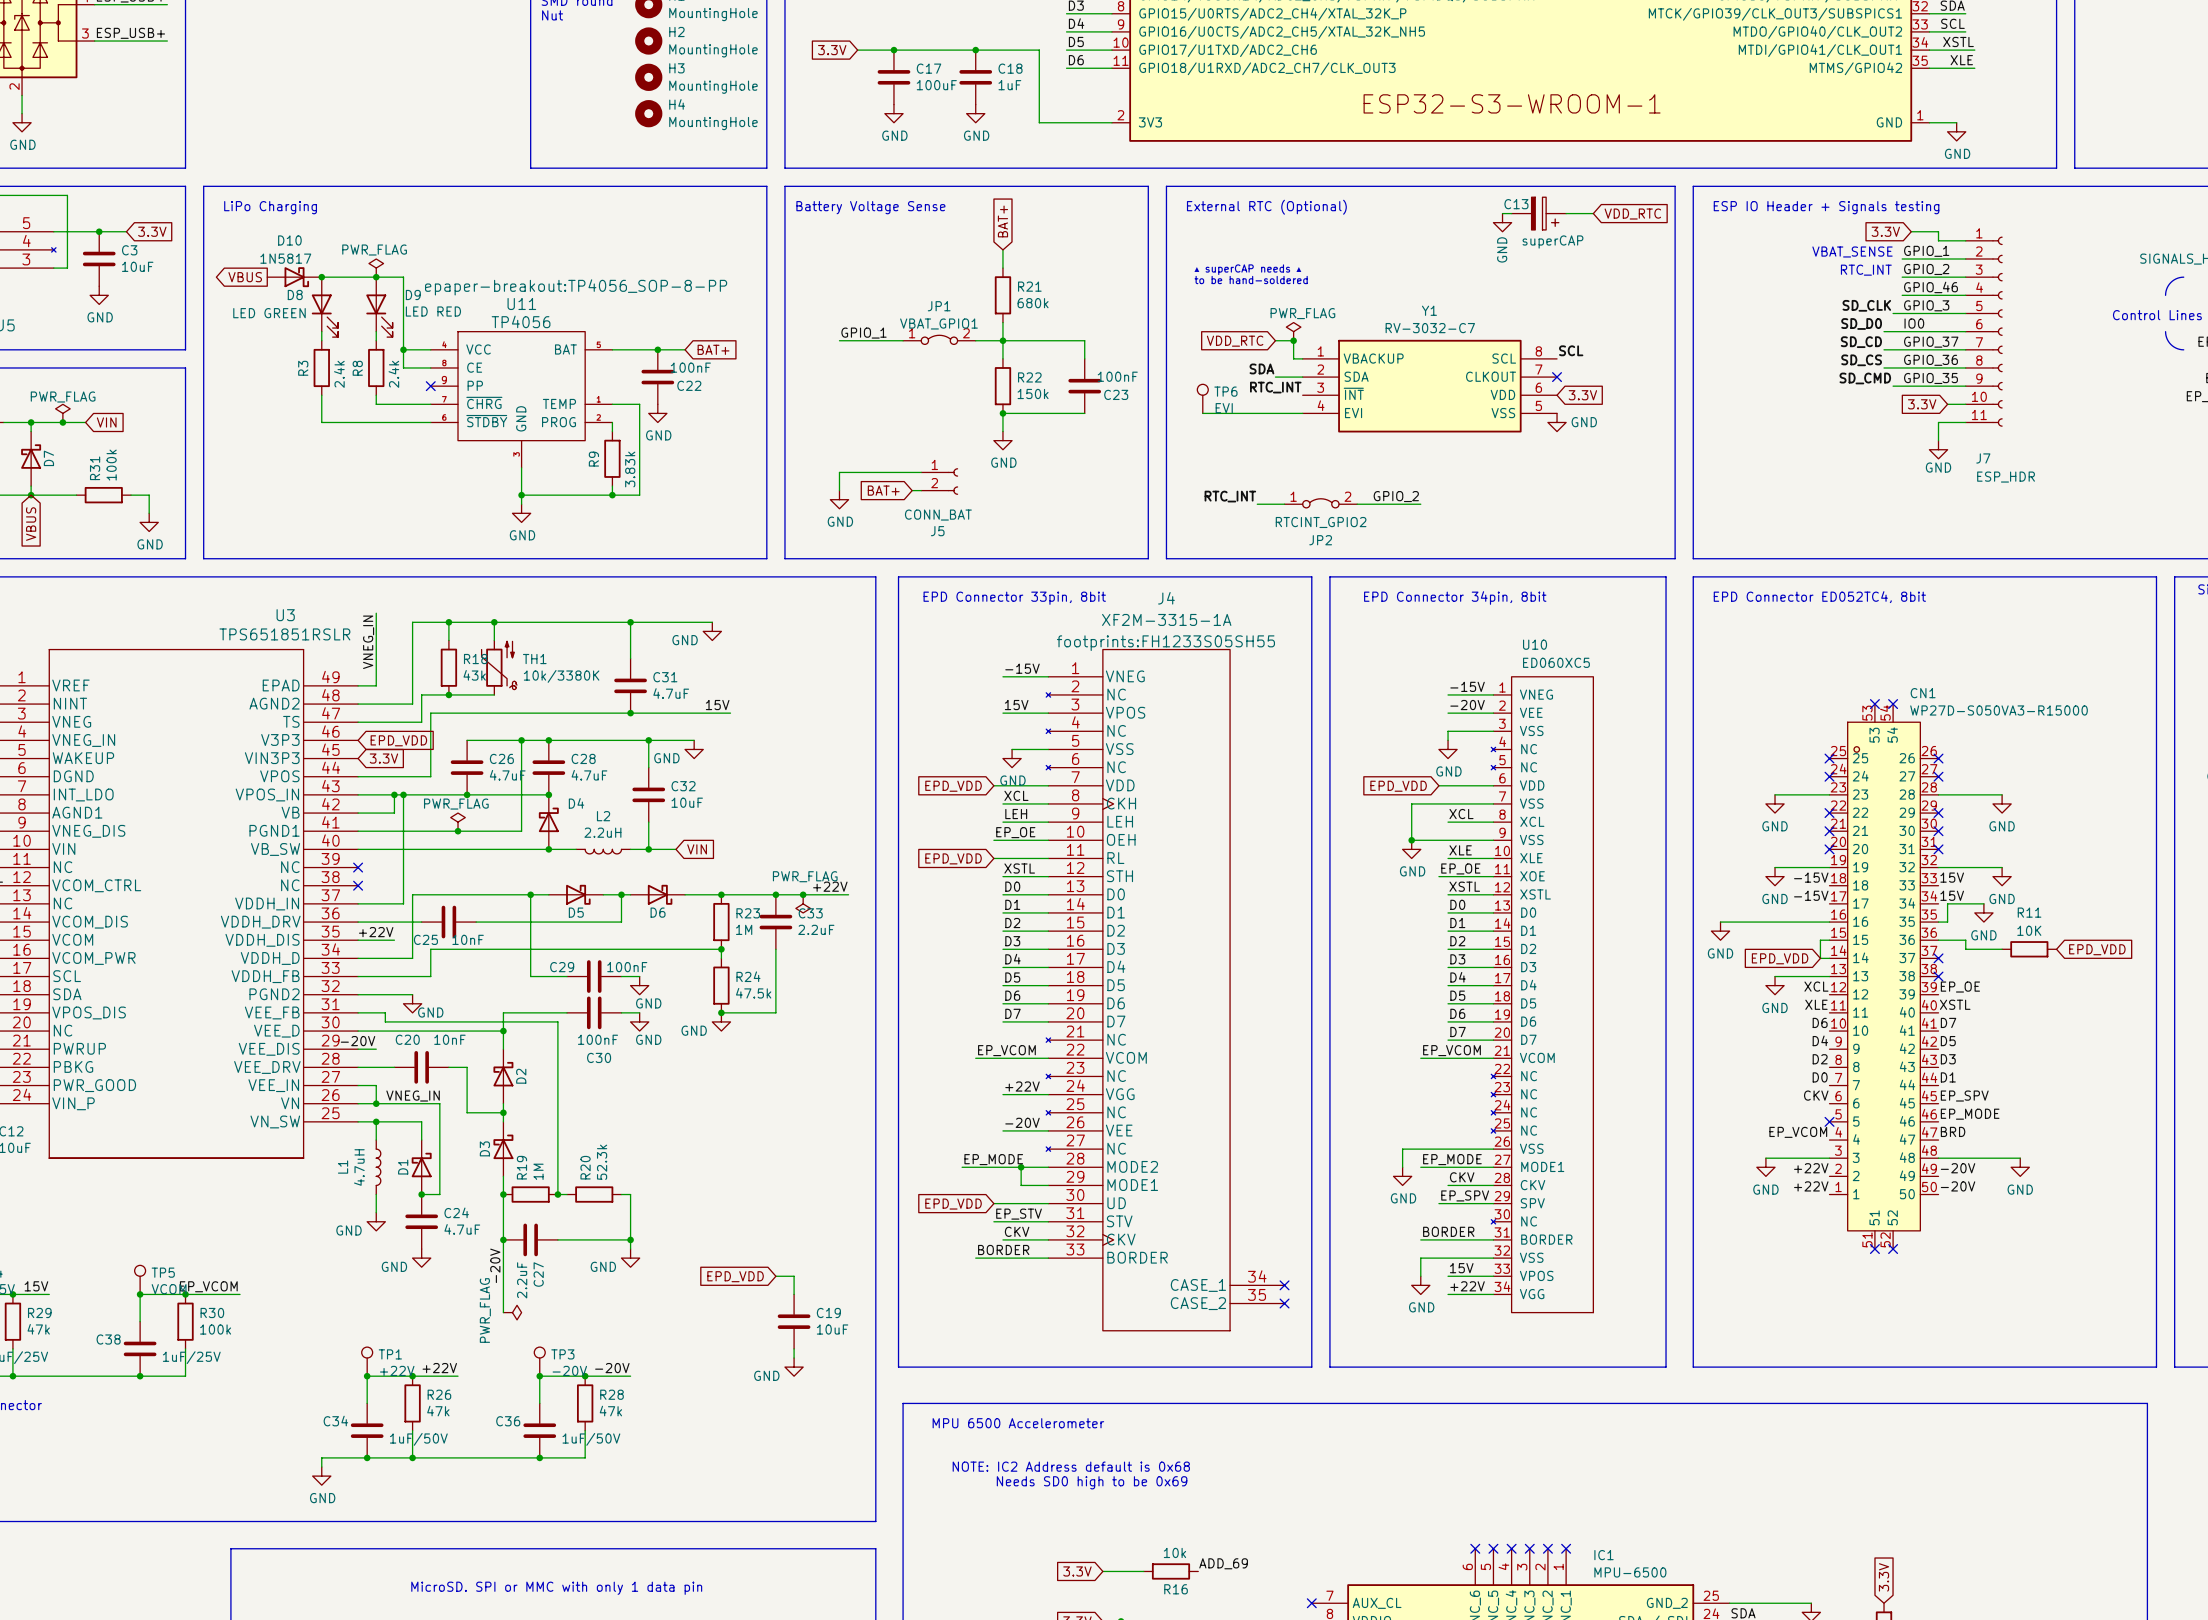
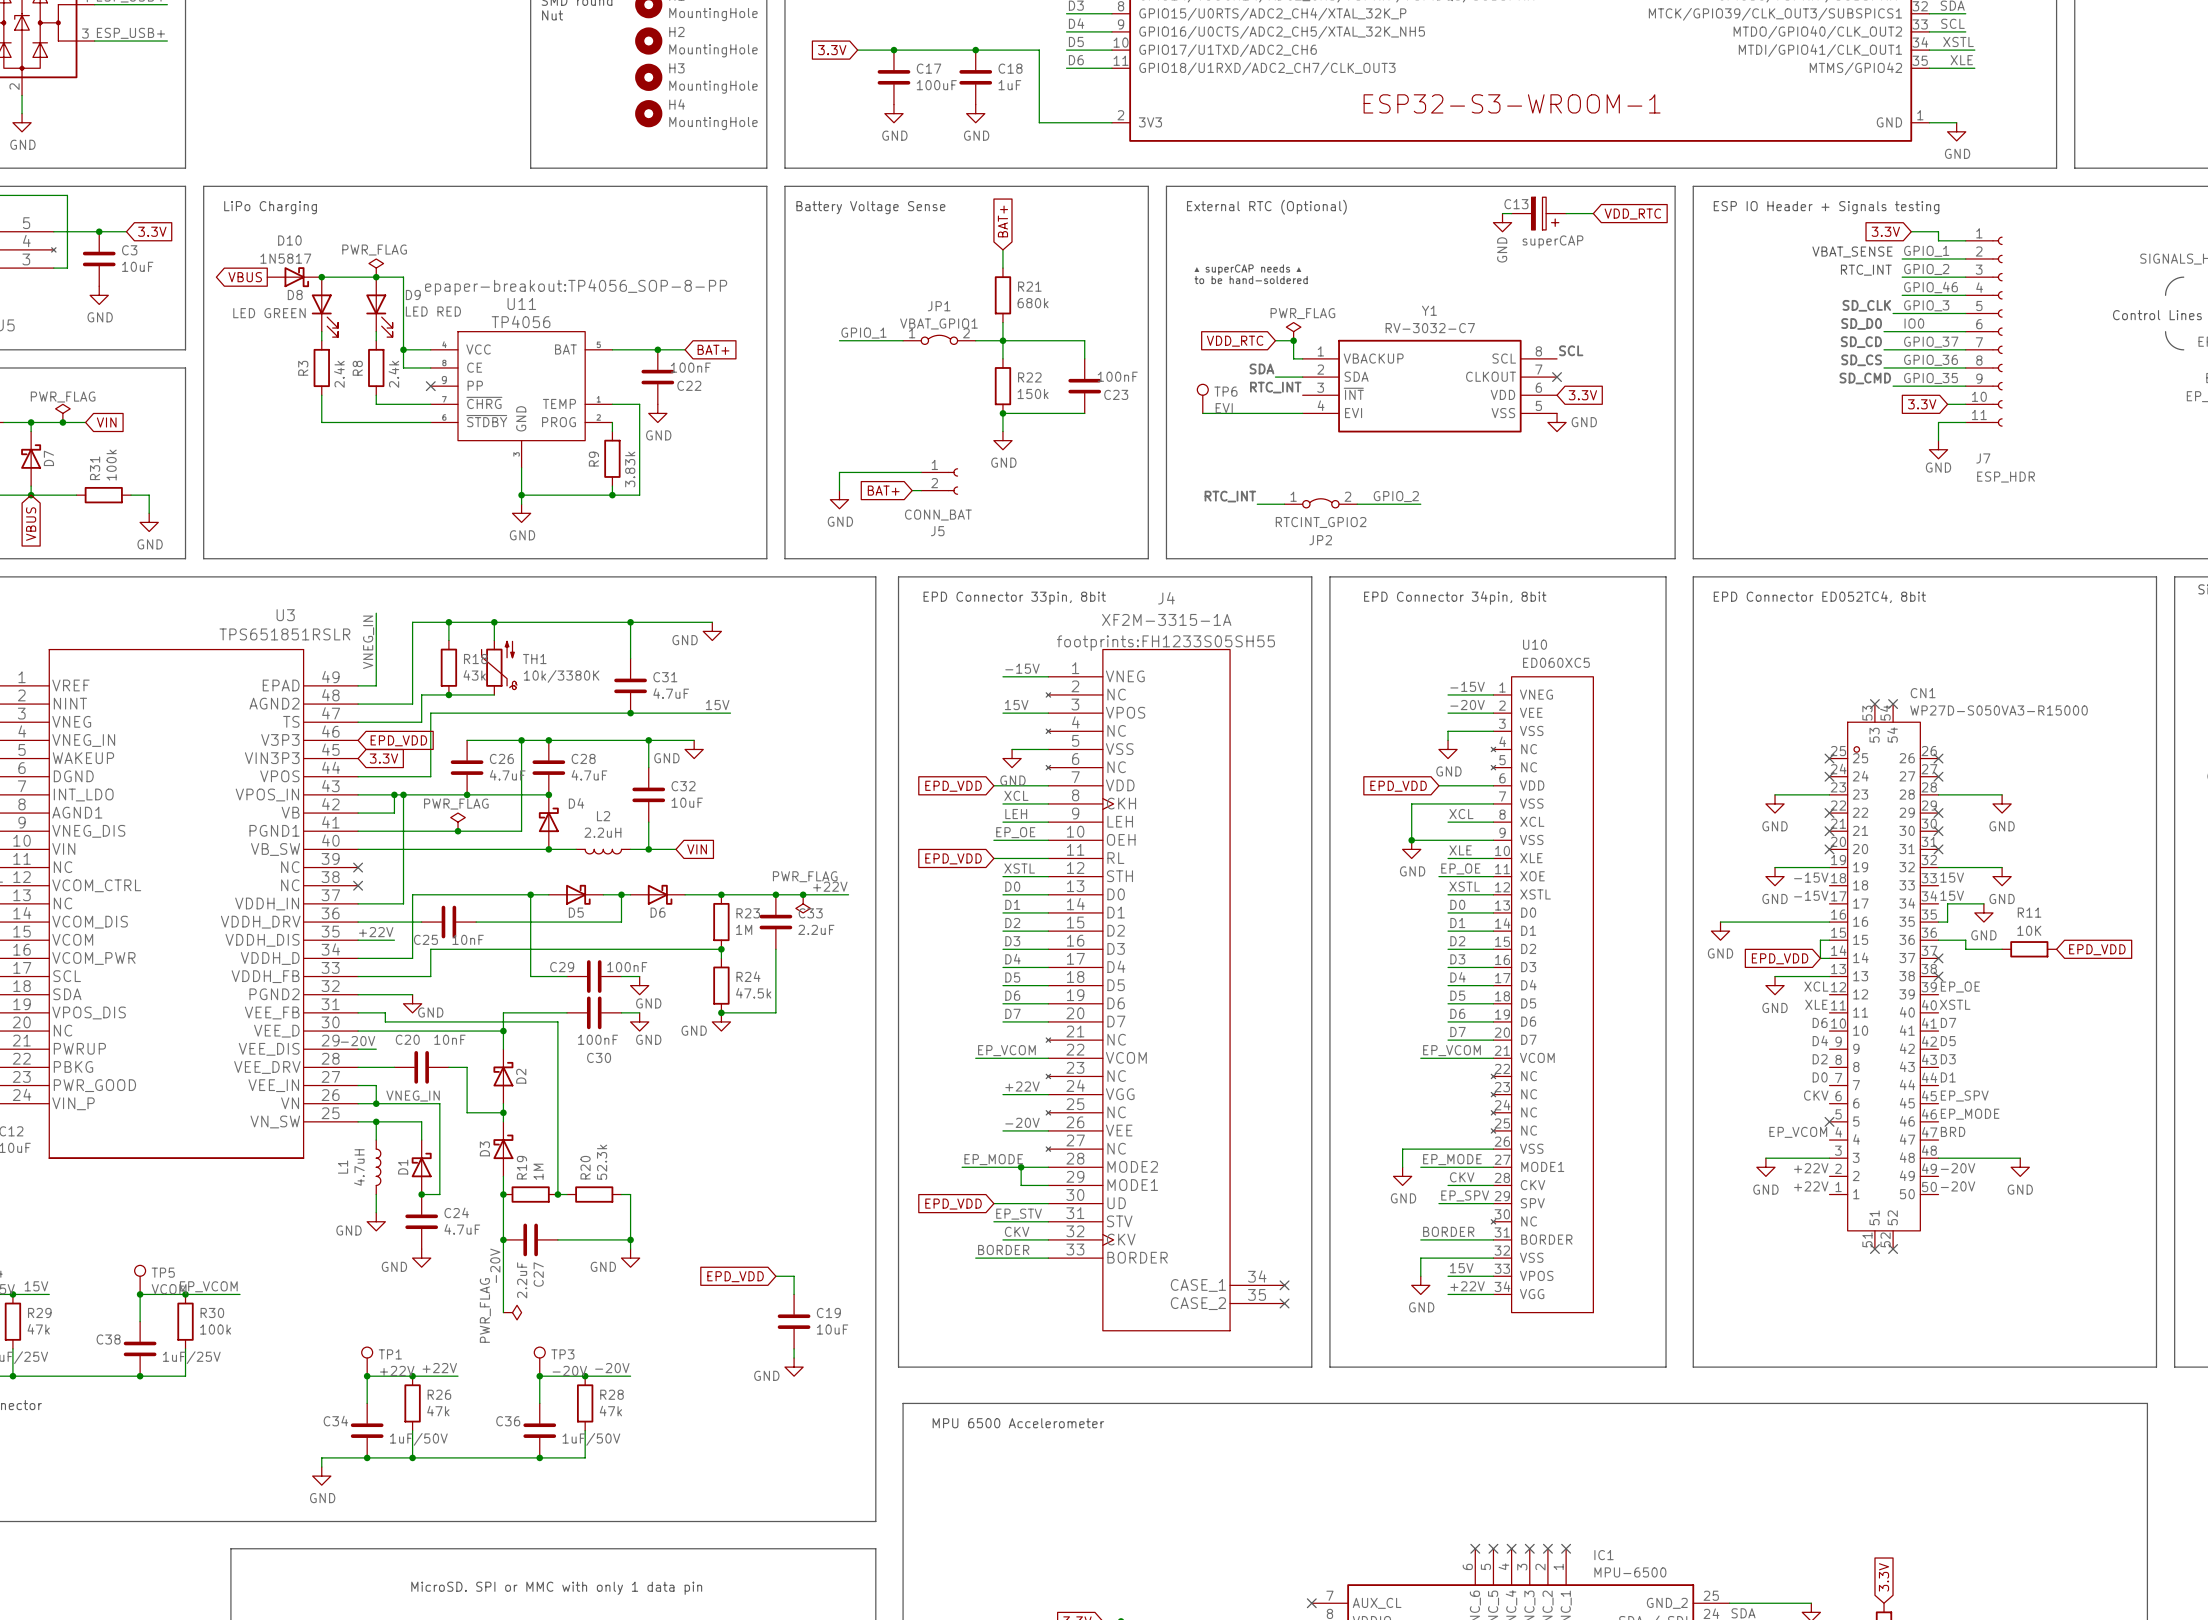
text: NOTE: IC2 Address default is 0x68 (1071, 1466) -> none
text: Needs SD0 high to be 0x69 (1092, 1482) -> none
label: ADD_69 (1223, 1563) -> none
global label: 3.3V (1077, 1571) -> none
wire: (1102, 1571) (1143, 1571) -> none
R16: 10k (1171, 1571) -> none

